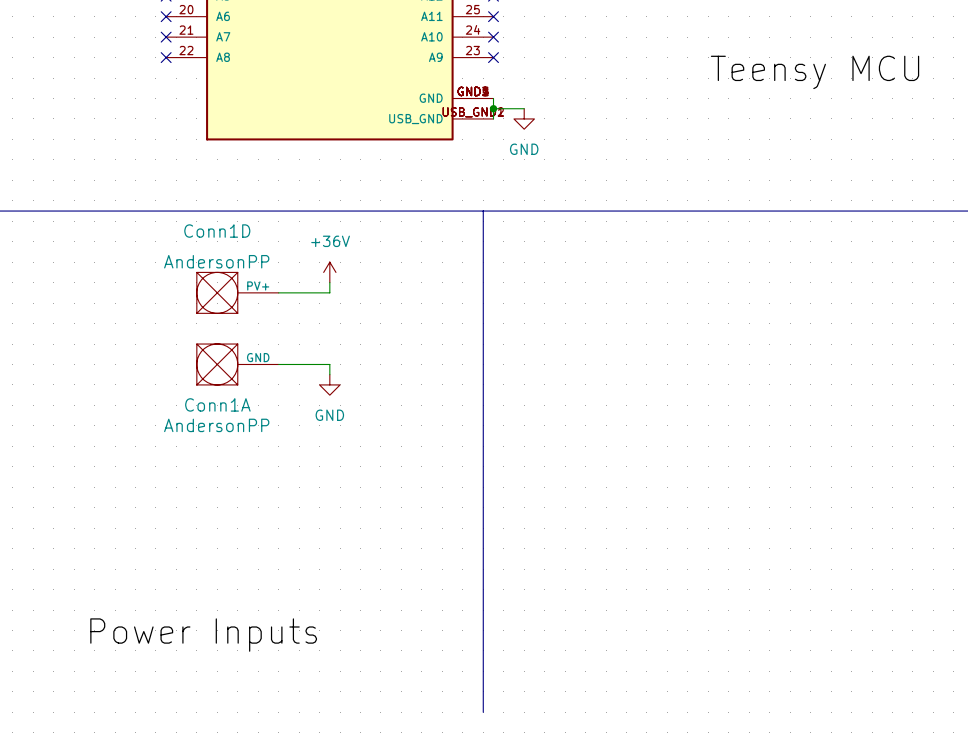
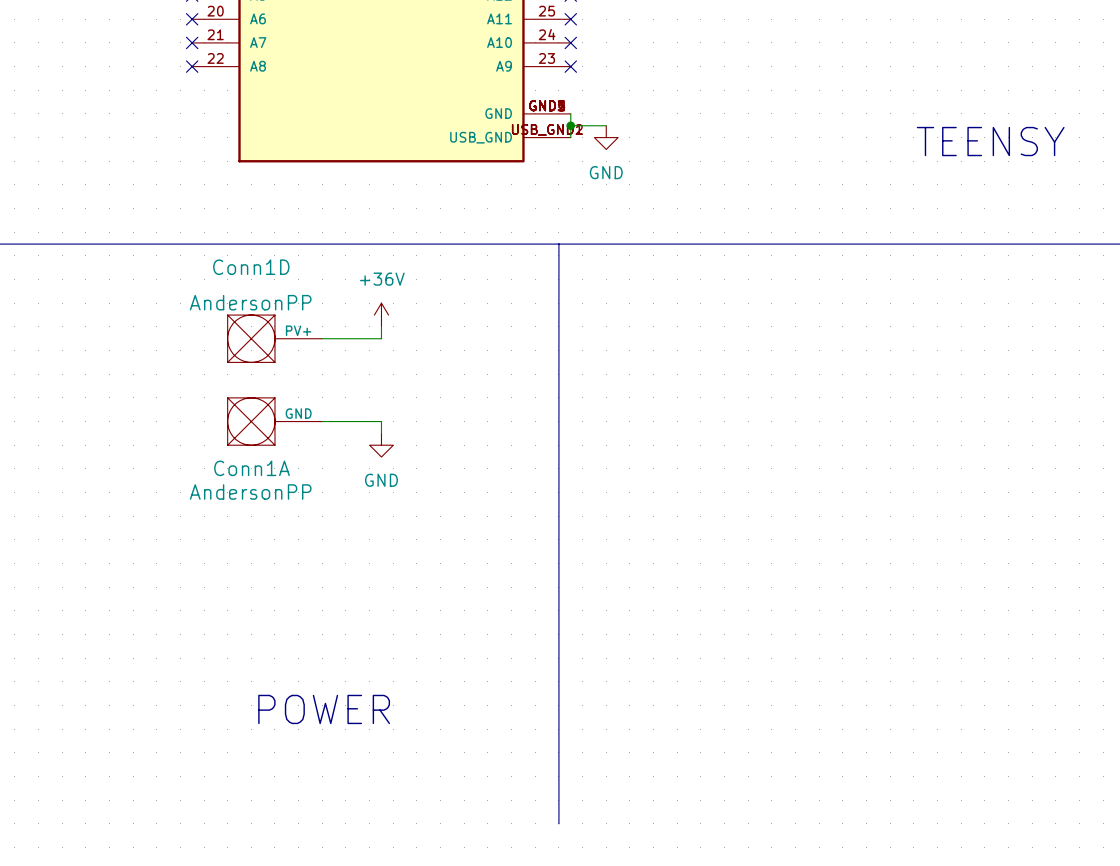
label: Teensy MCU (815, 72) -> none
text: none -> TEENSY (990, 141)
text: none -> POWER (324, 709)
label: Power Inputs (203, 635) -> none

